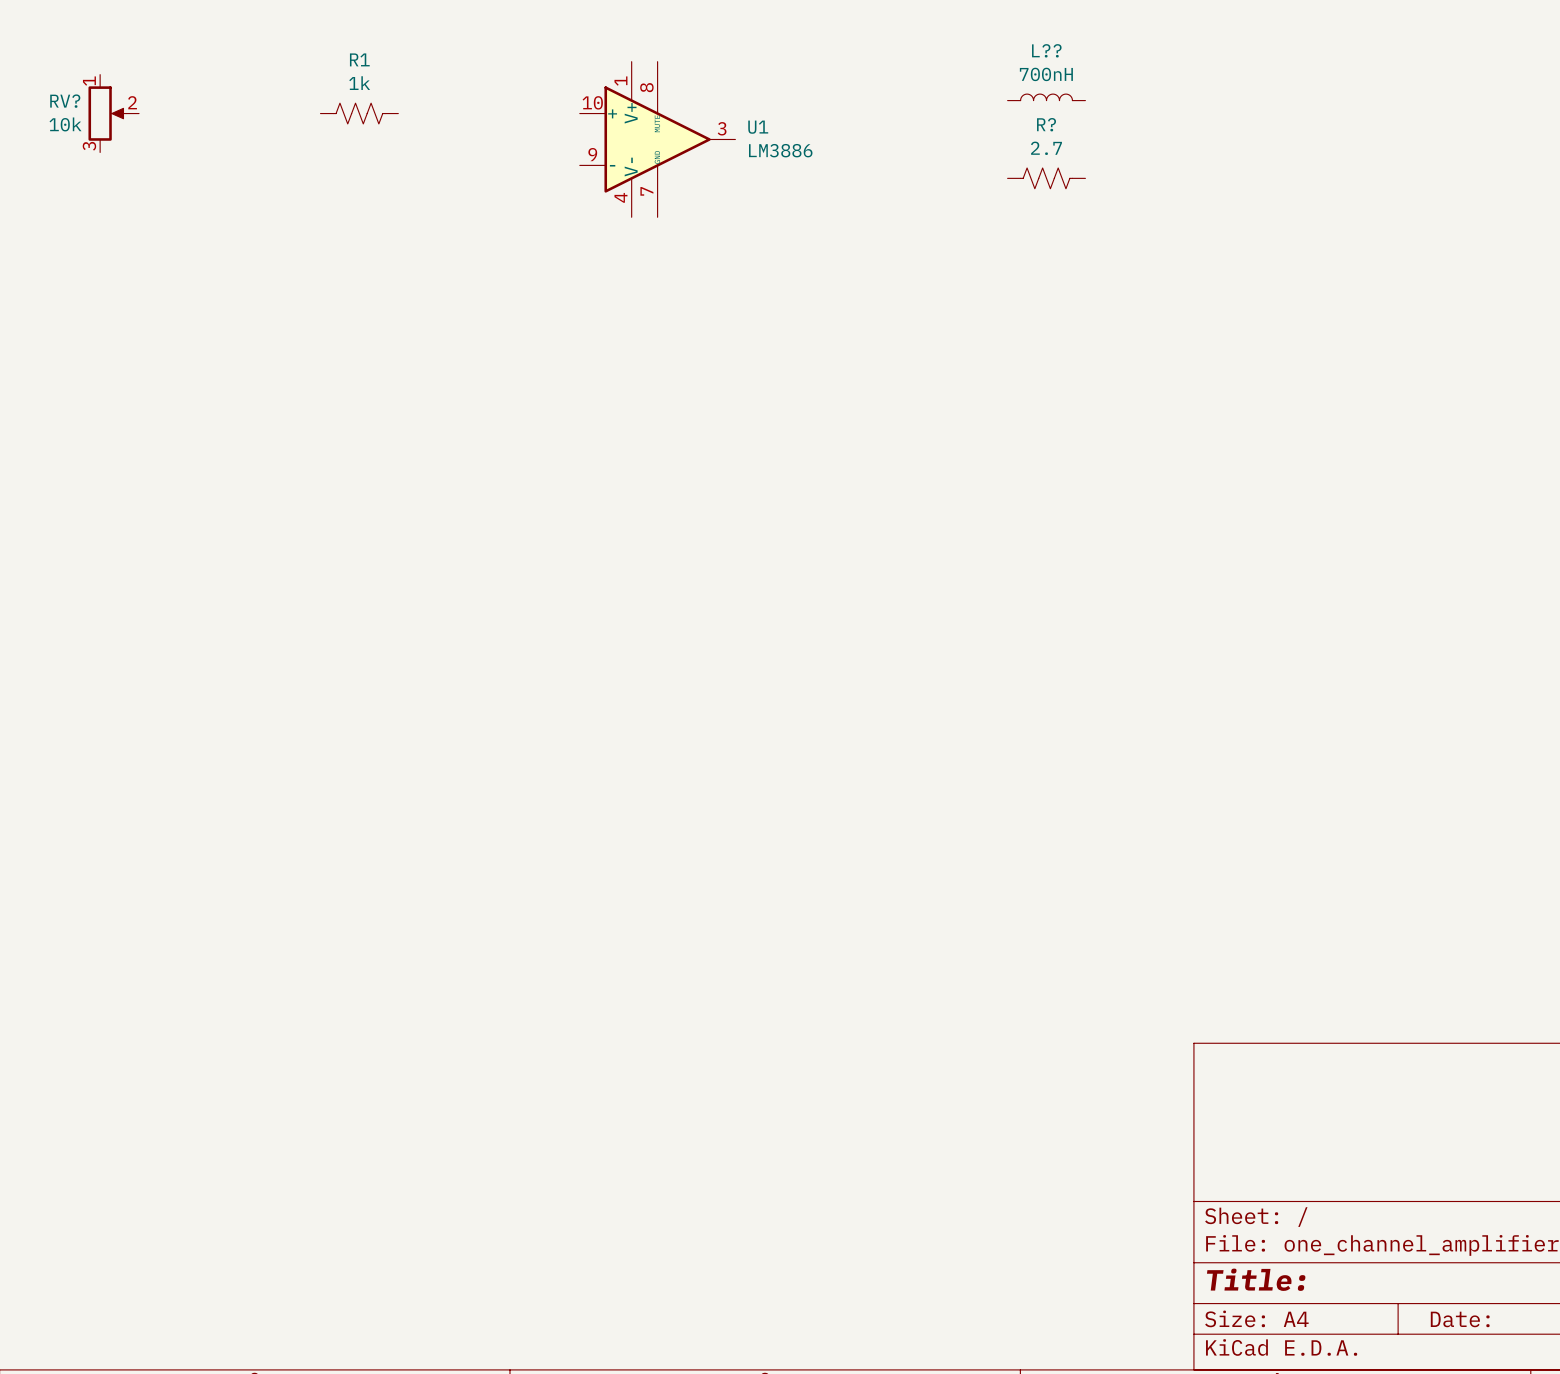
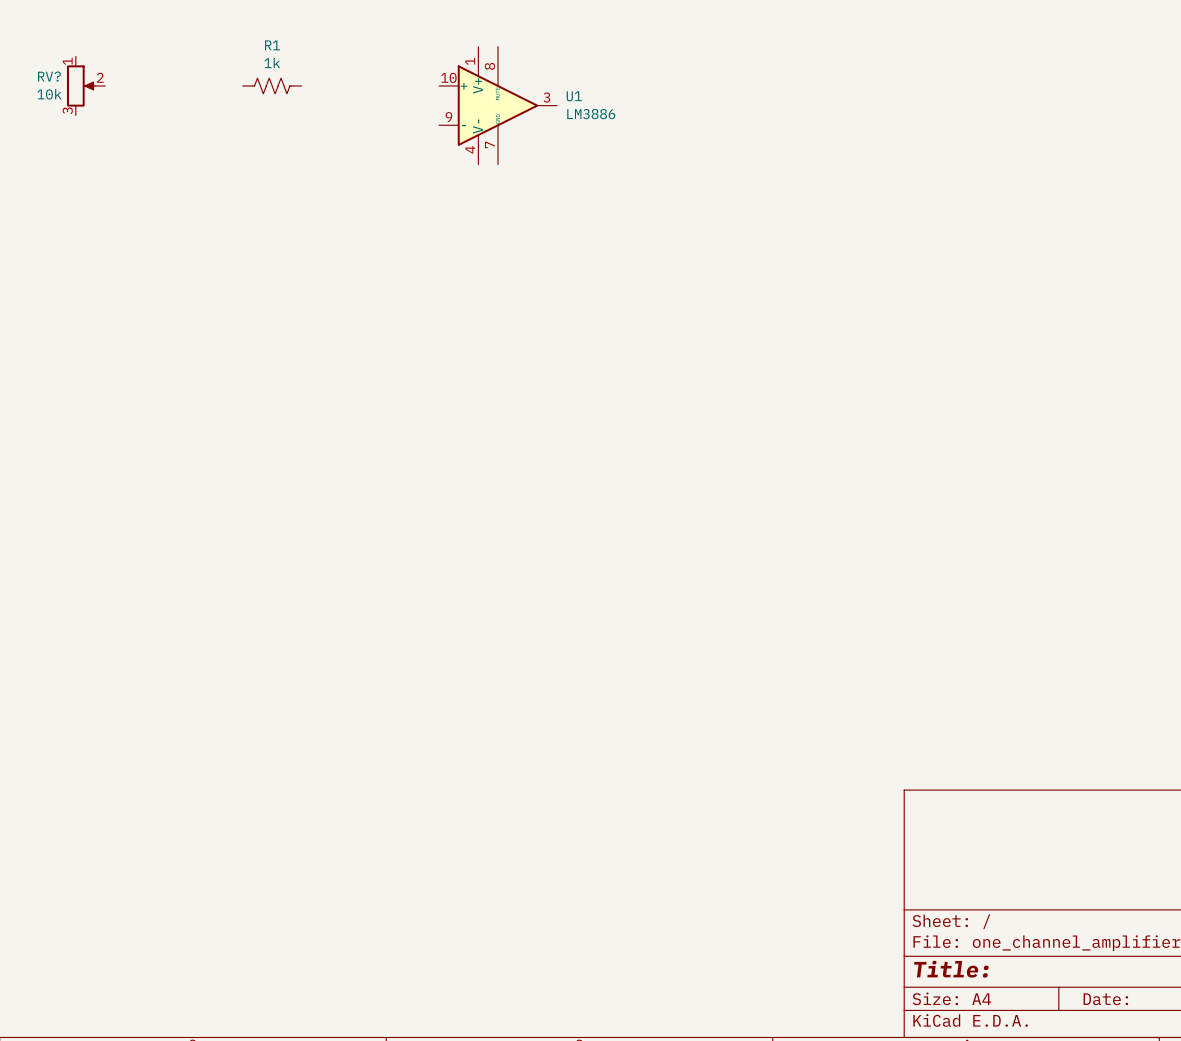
L??: (1046, 97) -> none
R?: 2.7 (1046, 178) -> none

